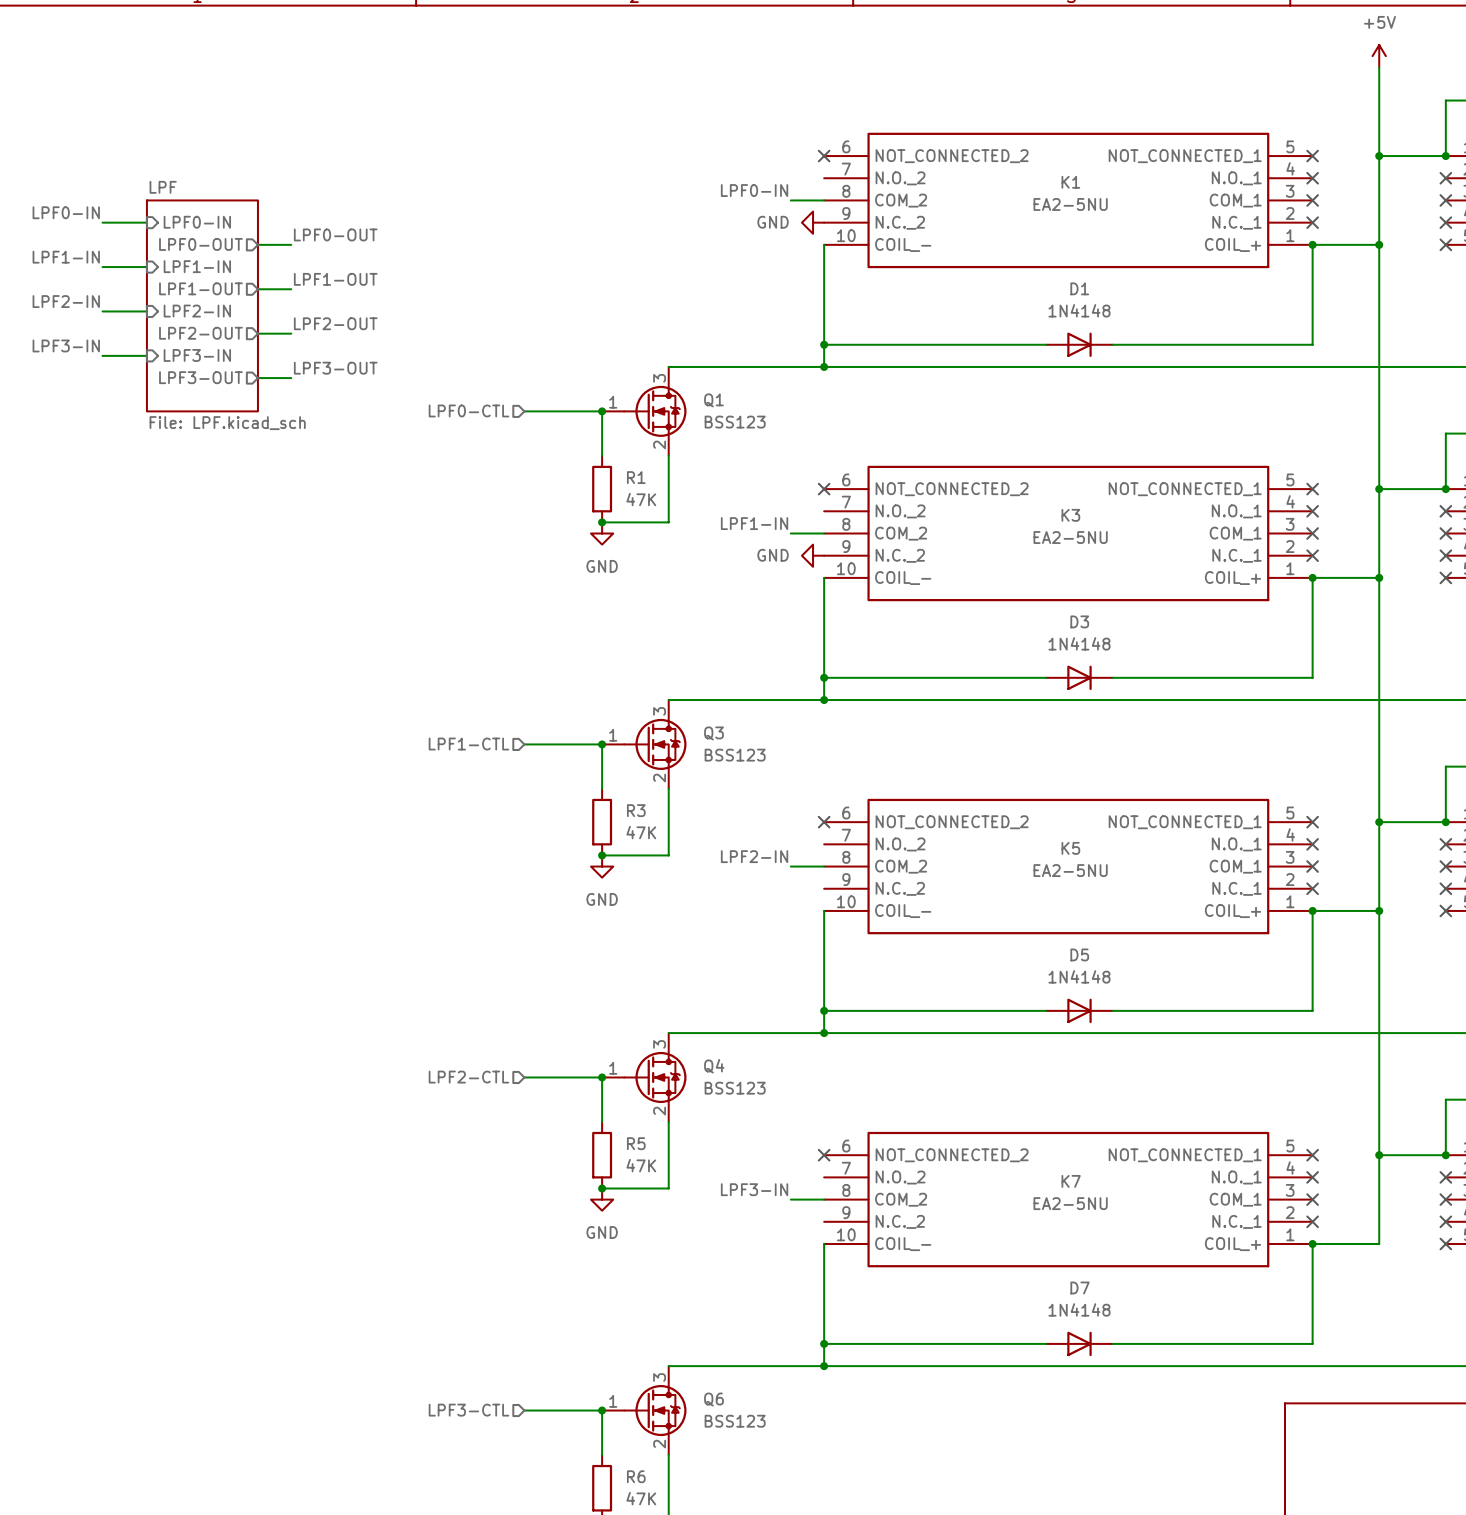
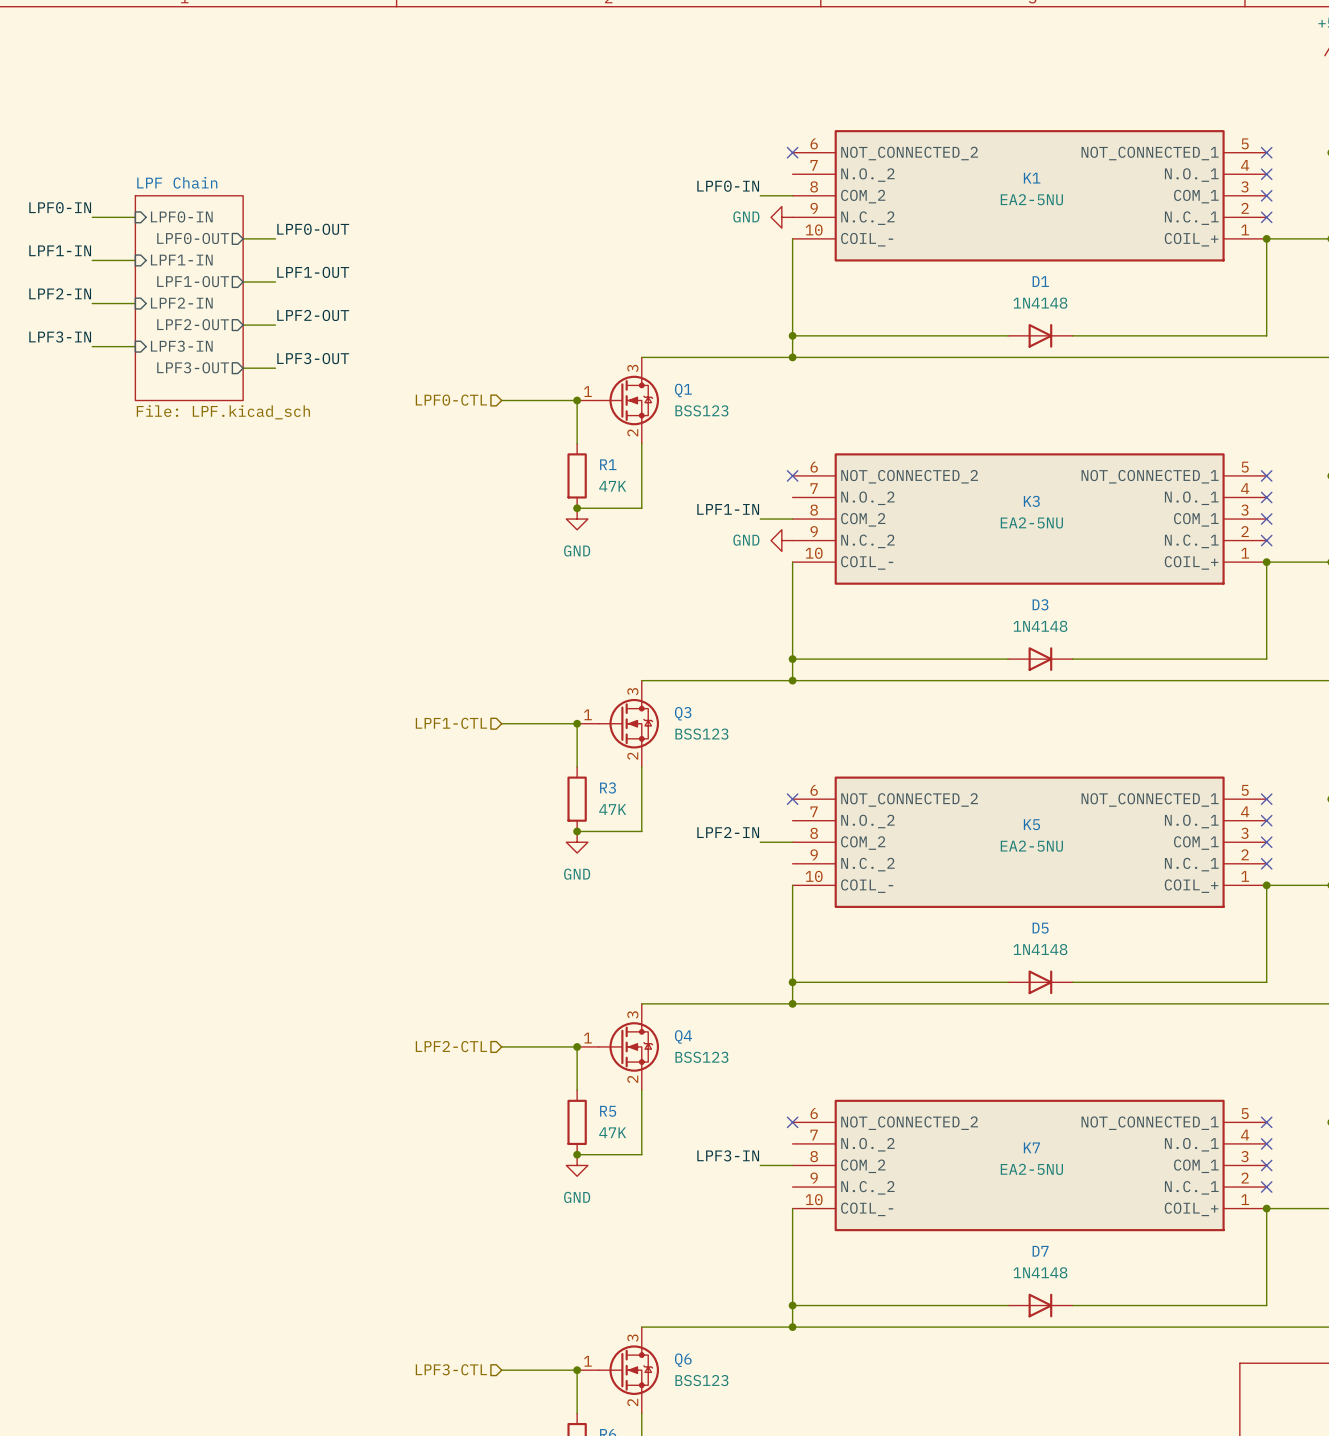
sheet LPF name: LPF (163, 187) -> LPF Chain (177, 182)

